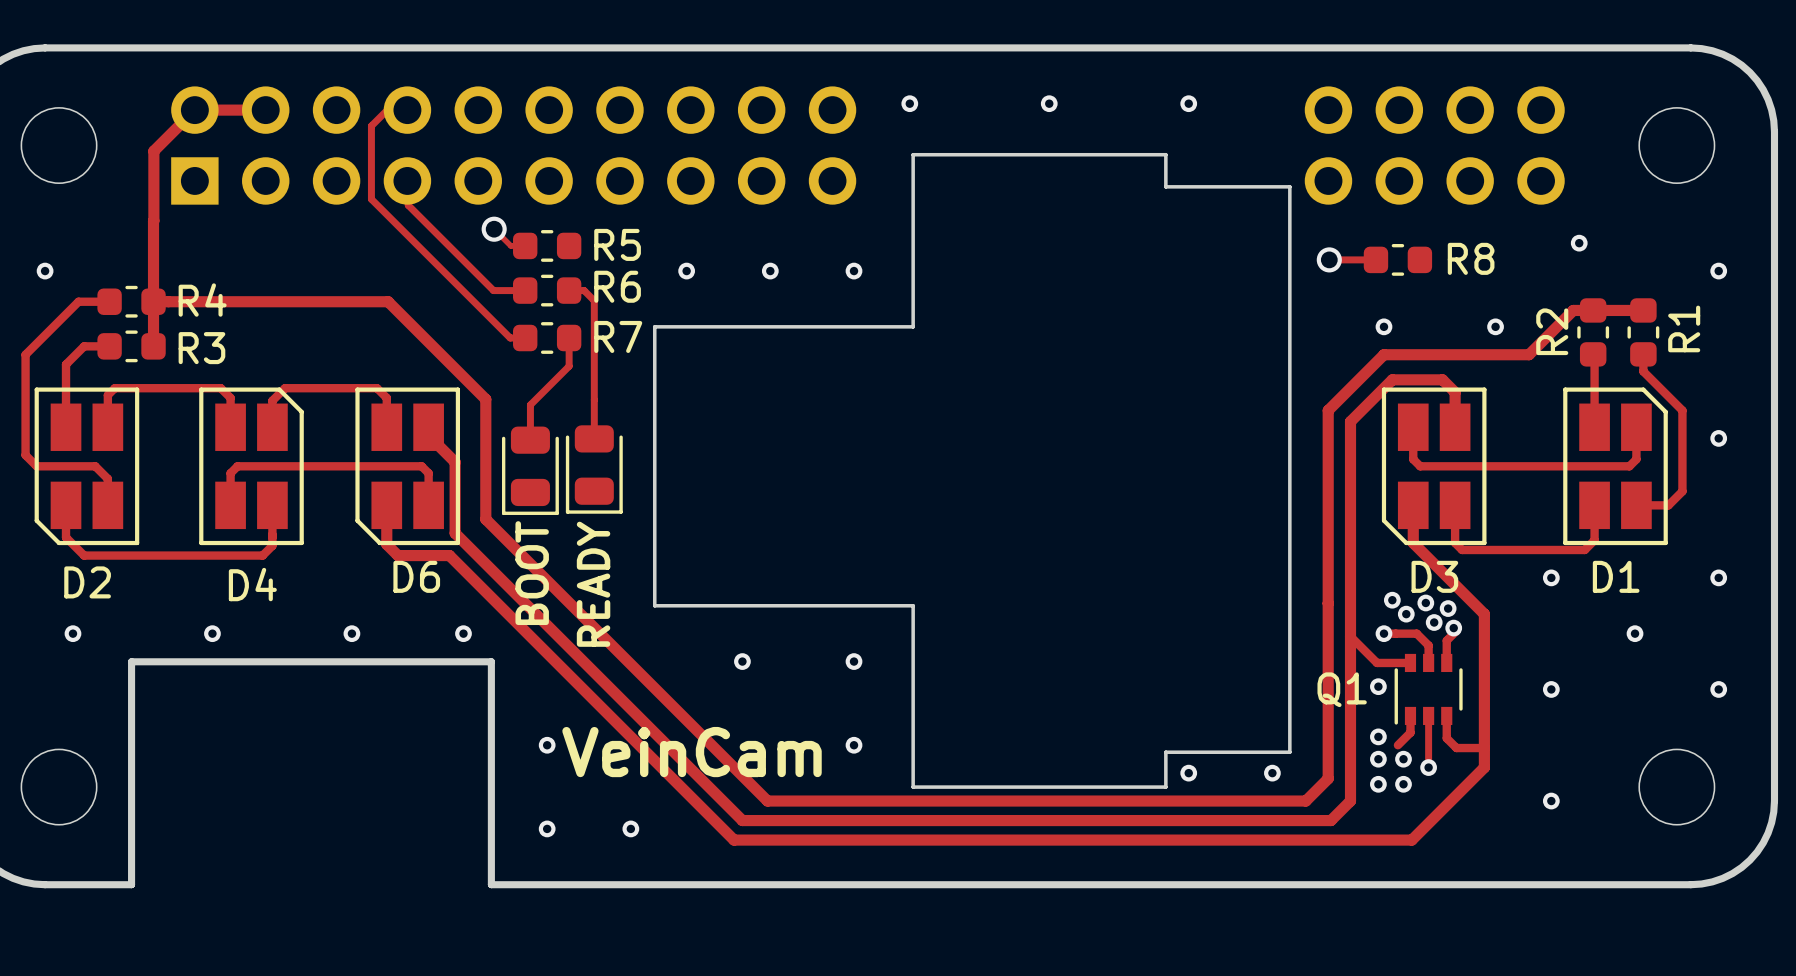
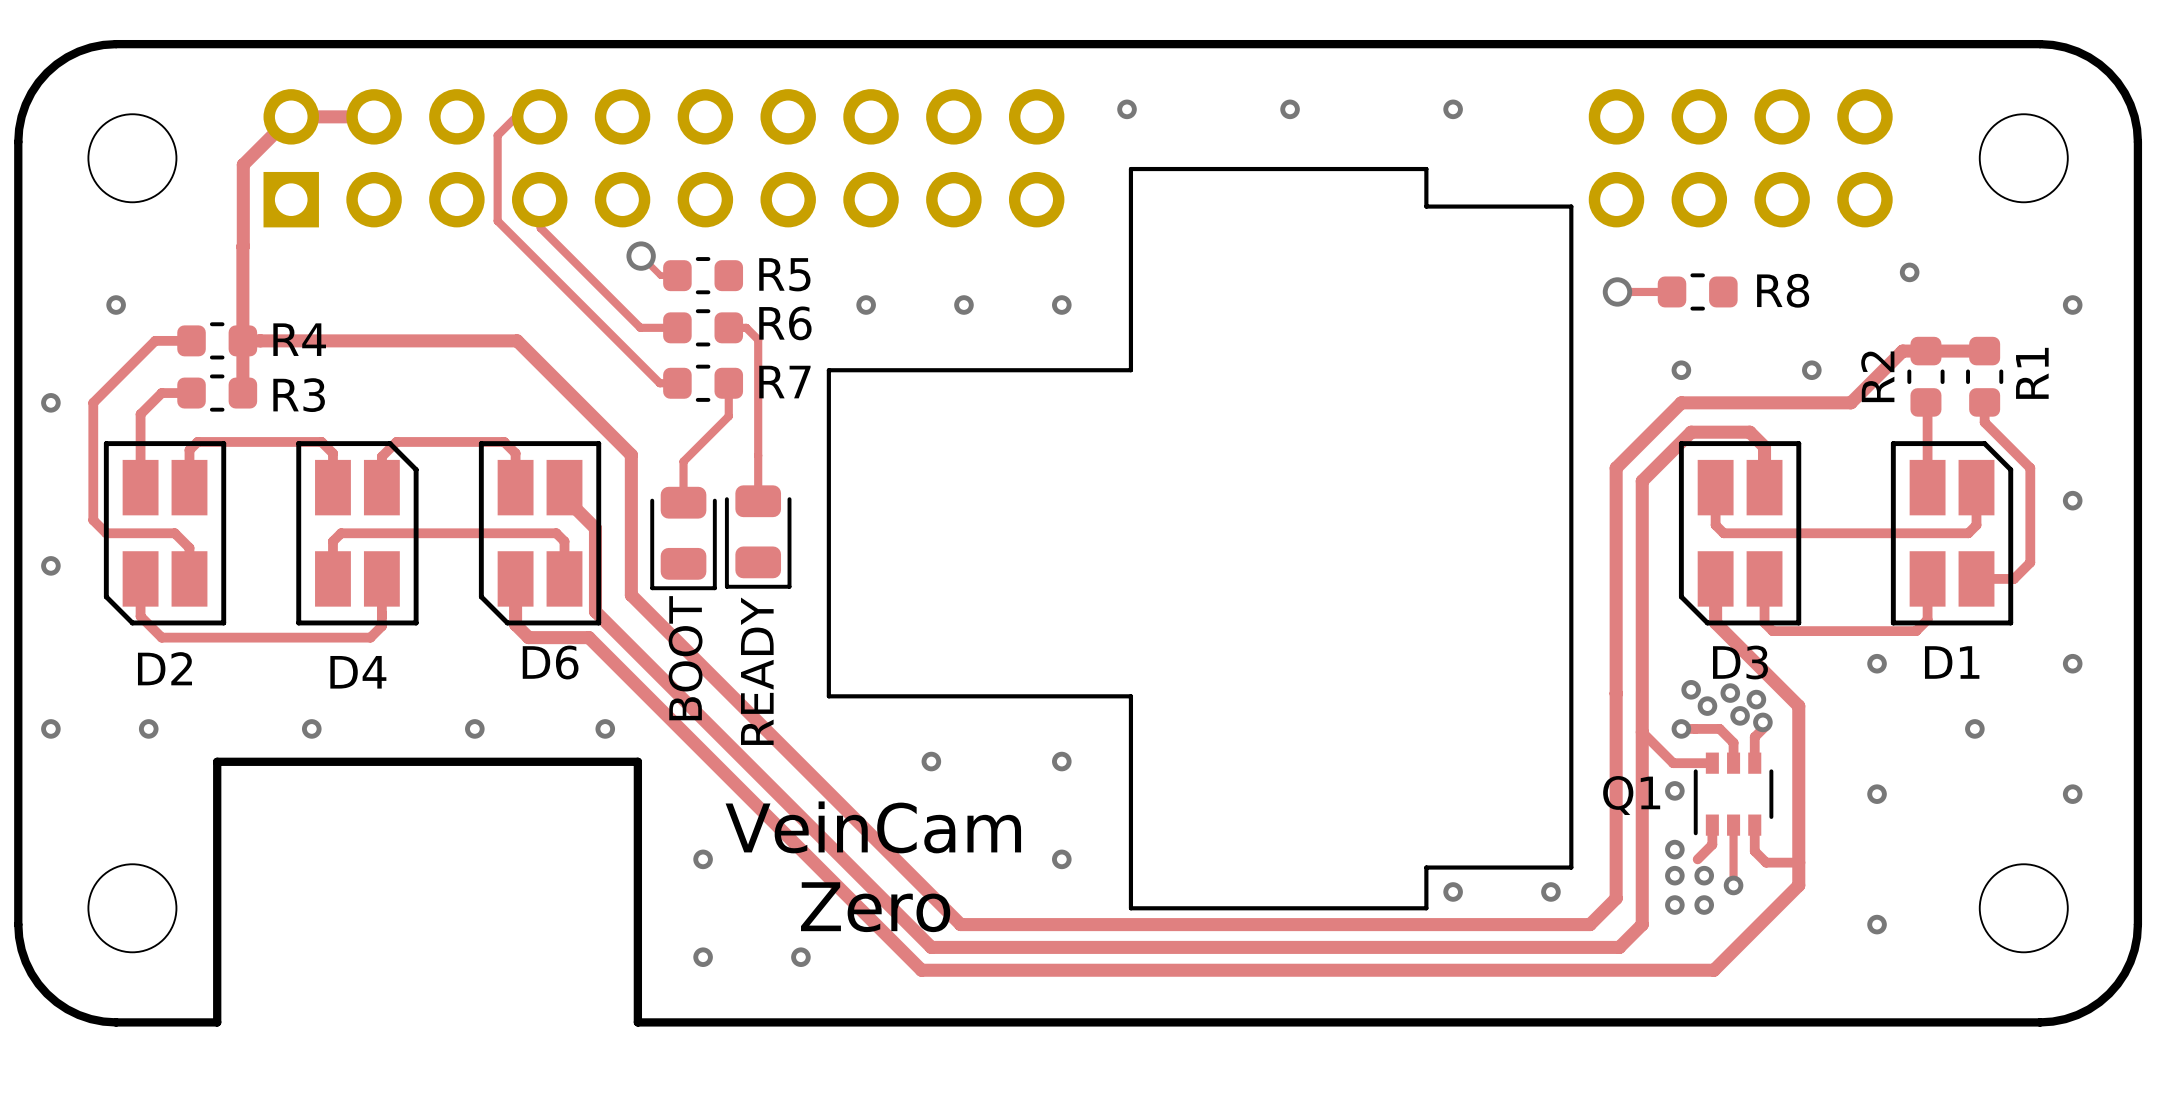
text position: VeinCam (692, 752) -> VeinCam (873, 827)
text: none -> Zero (875, 907)

